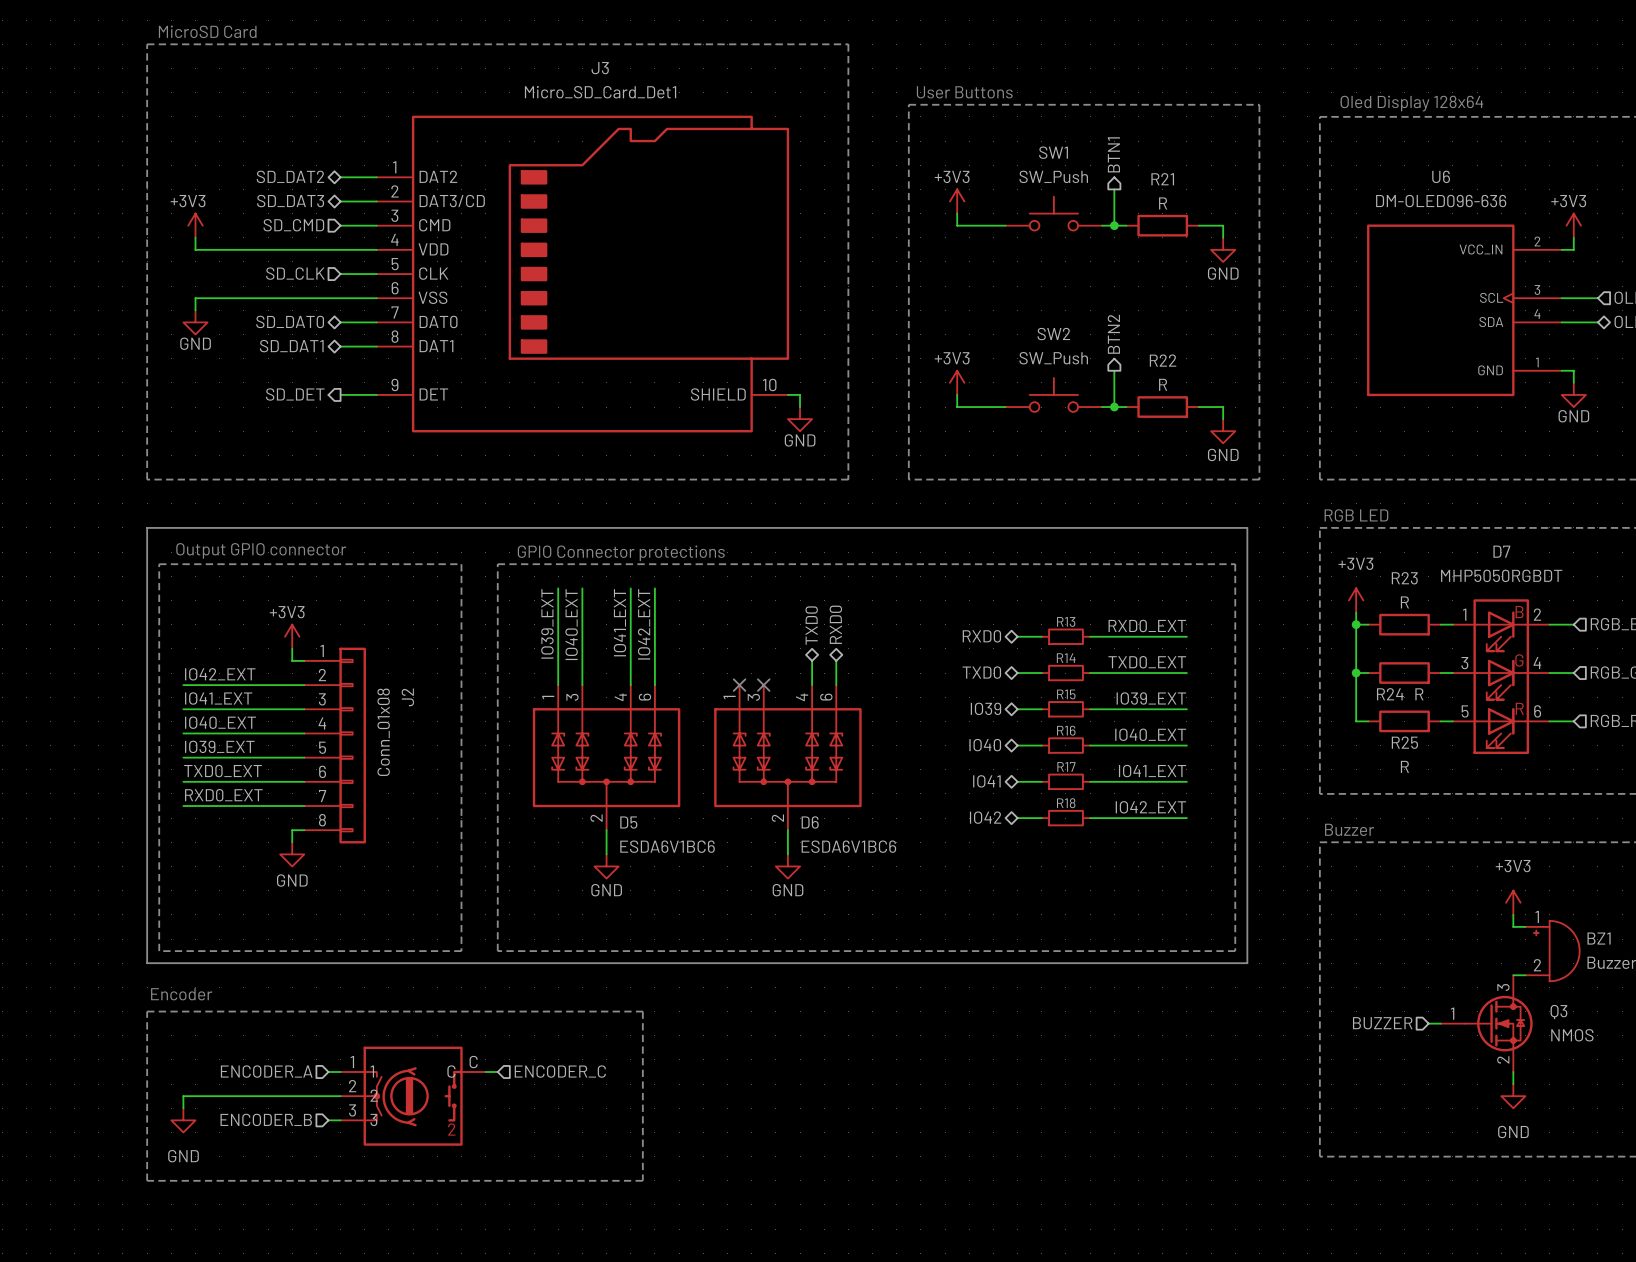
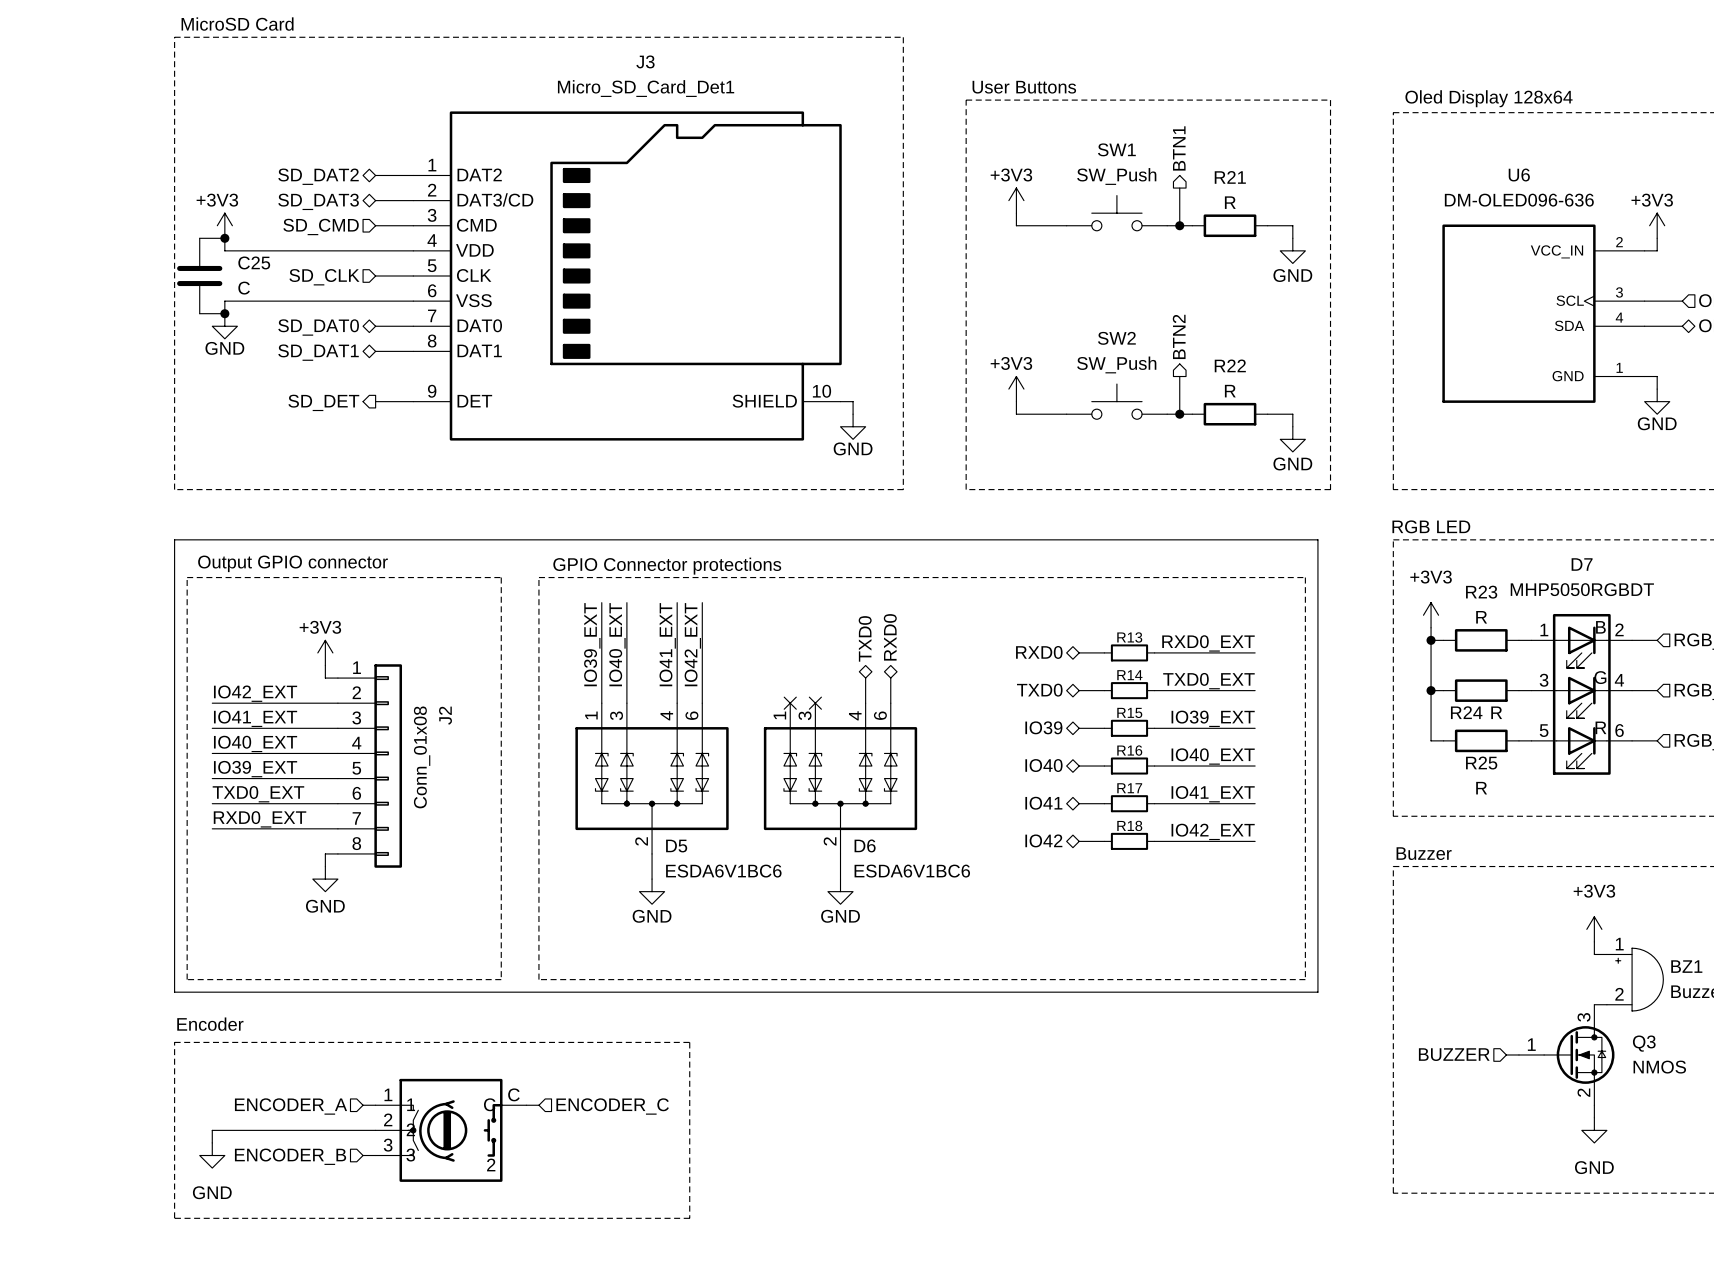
wire: none -> (199, 238) (224, 238)
junction: none -> (224, 238)
C25: none -> C (199, 276)
wire: none -> (199, 313) (224, 313)
junction: none -> (224, 313)

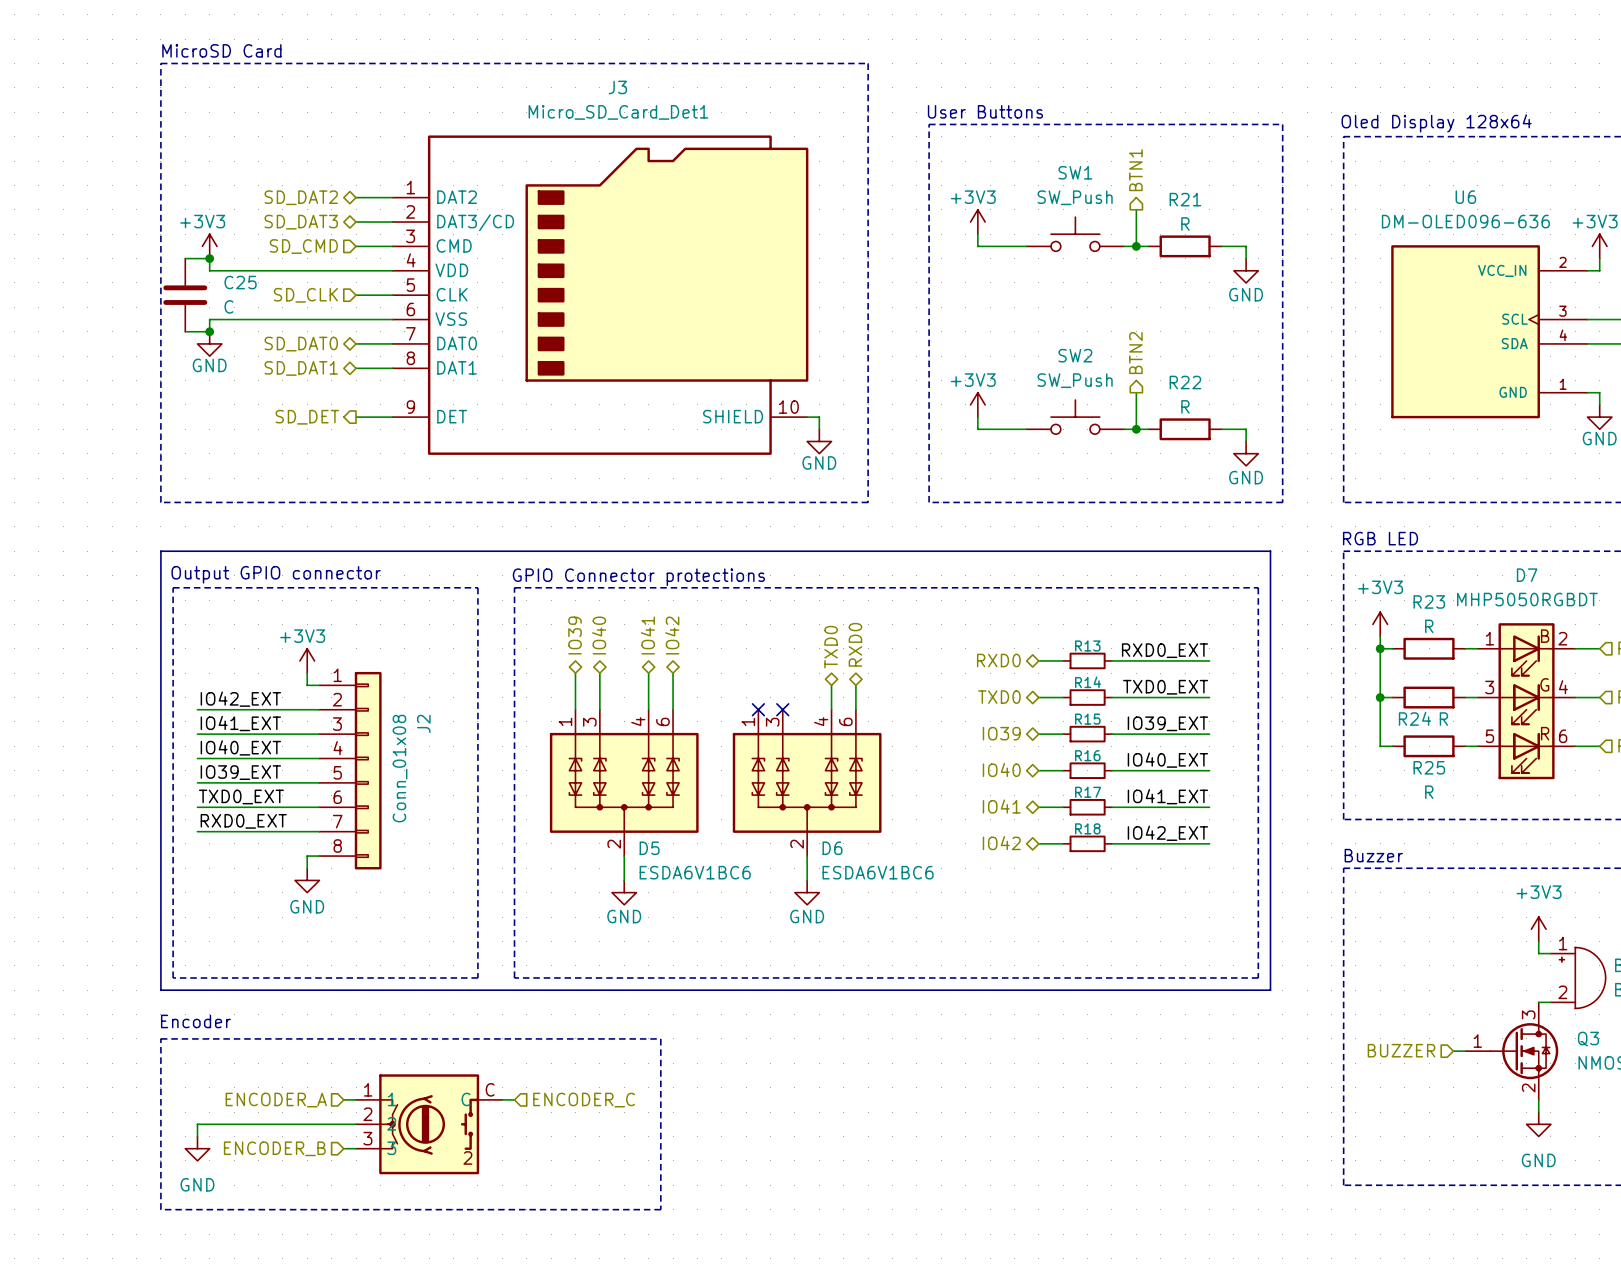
wire: (601, 602) (601, 665) -> none
wire: (626, 602) (626, 665) -> none
wire: (677, 602) (677, 665) -> none
wire: (702, 602) (702, 665) -> none
hierarchical label: none -> IO39 (575, 635)
hierarchical label: none -> IO40 (599, 635)
hierarchical label: none -> IO41 (647, 635)
hierarchical label: none -> IO42 (672, 635)
label: IO39_EXT (592, 644) -> none
label: IO40_EXT (617, 644) -> none
label: IO41_EXT (667, 644) -> none
label: IO42_EXT (692, 644) -> none

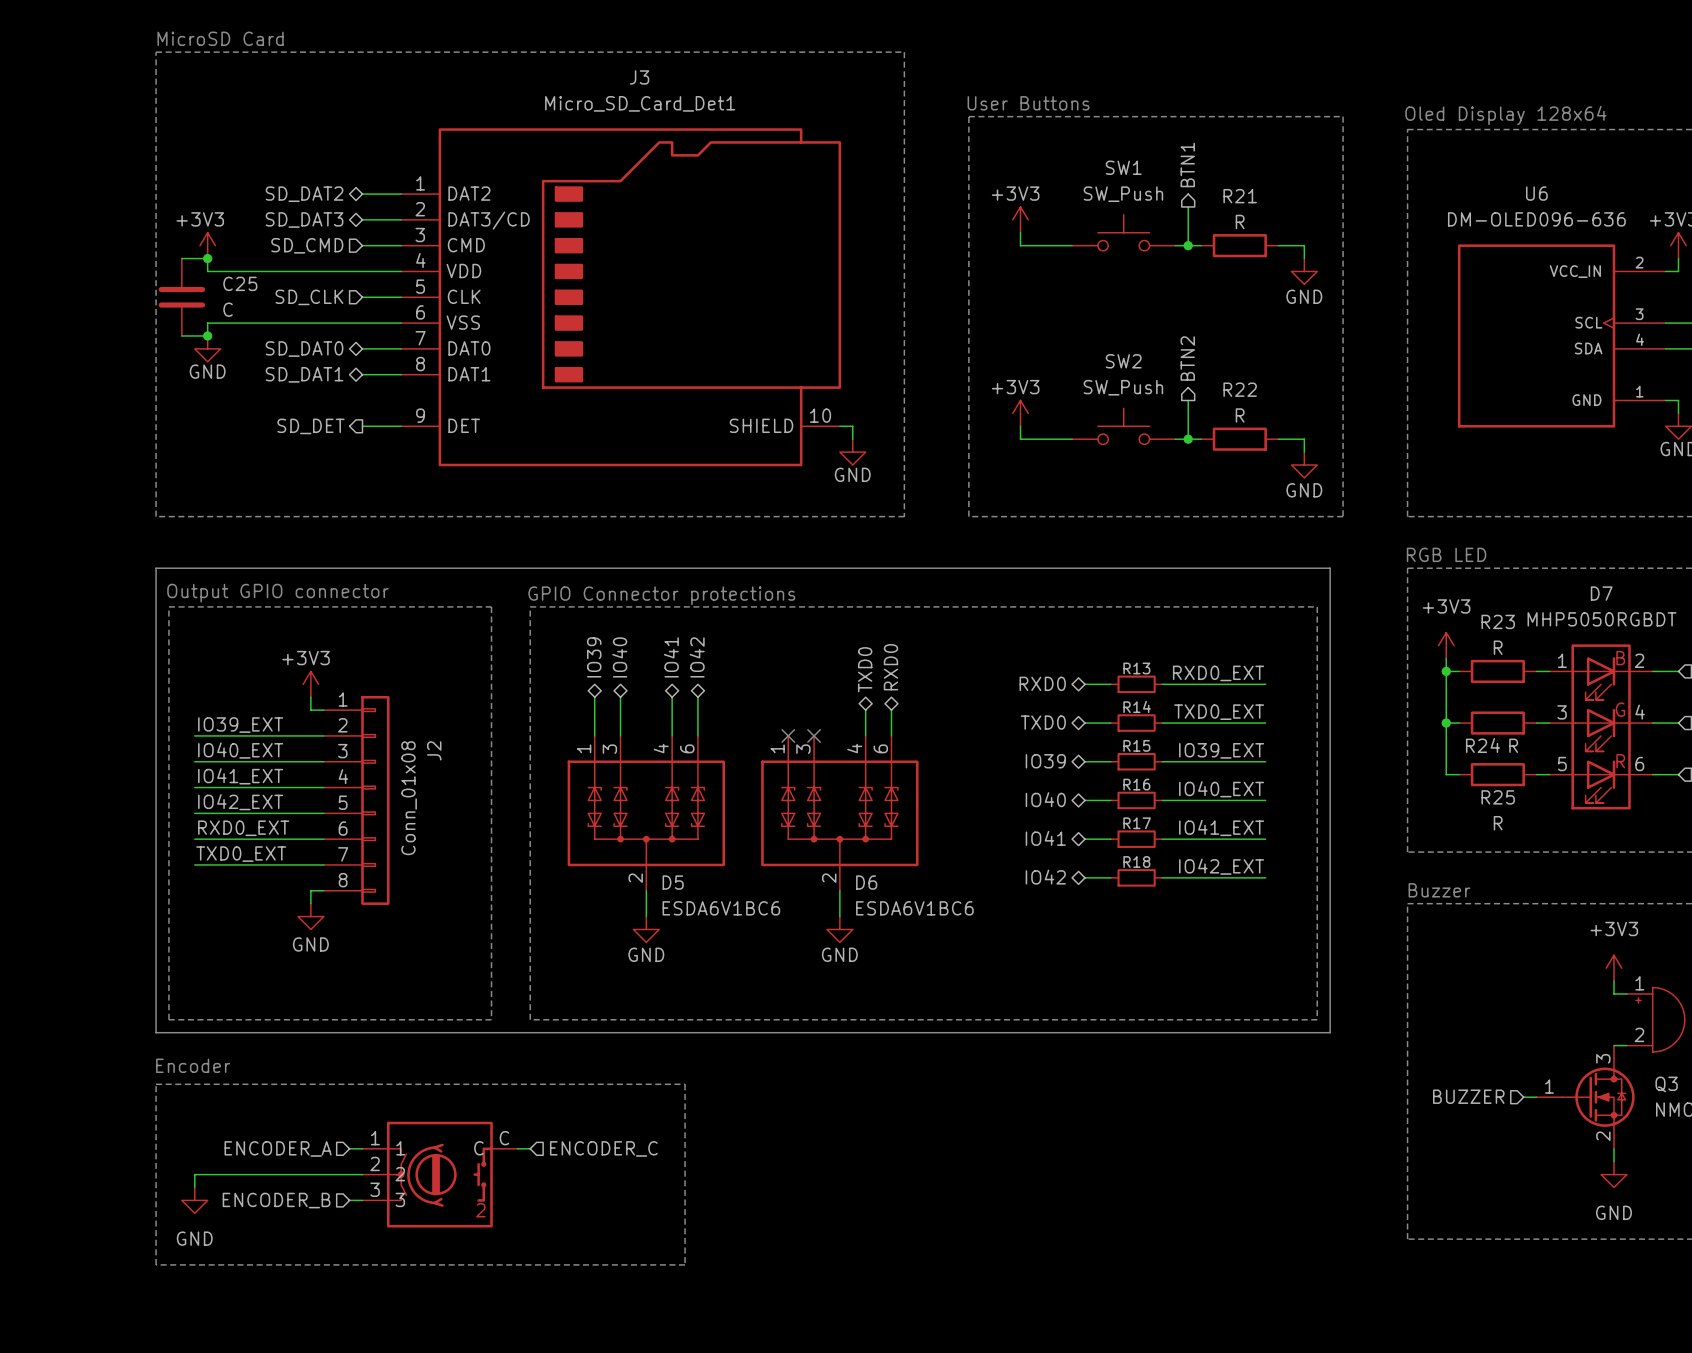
label: IO42_EXT (240, 699) -> IO39_EXT (240, 725)
label: IO41_EXT (240, 723) -> IO40_EXT (240, 750)
label: IO40_EXT (240, 747) -> IO41_EXT (240, 776)
label: IO39_EXT (240, 772) -> IO42_EXT (240, 802)
label: TXD0_EXT (241, 796) -> RXD0_EXT (243, 828)
label: RXD0_EXT (243, 821) -> TXD0_EXT (241, 854)

